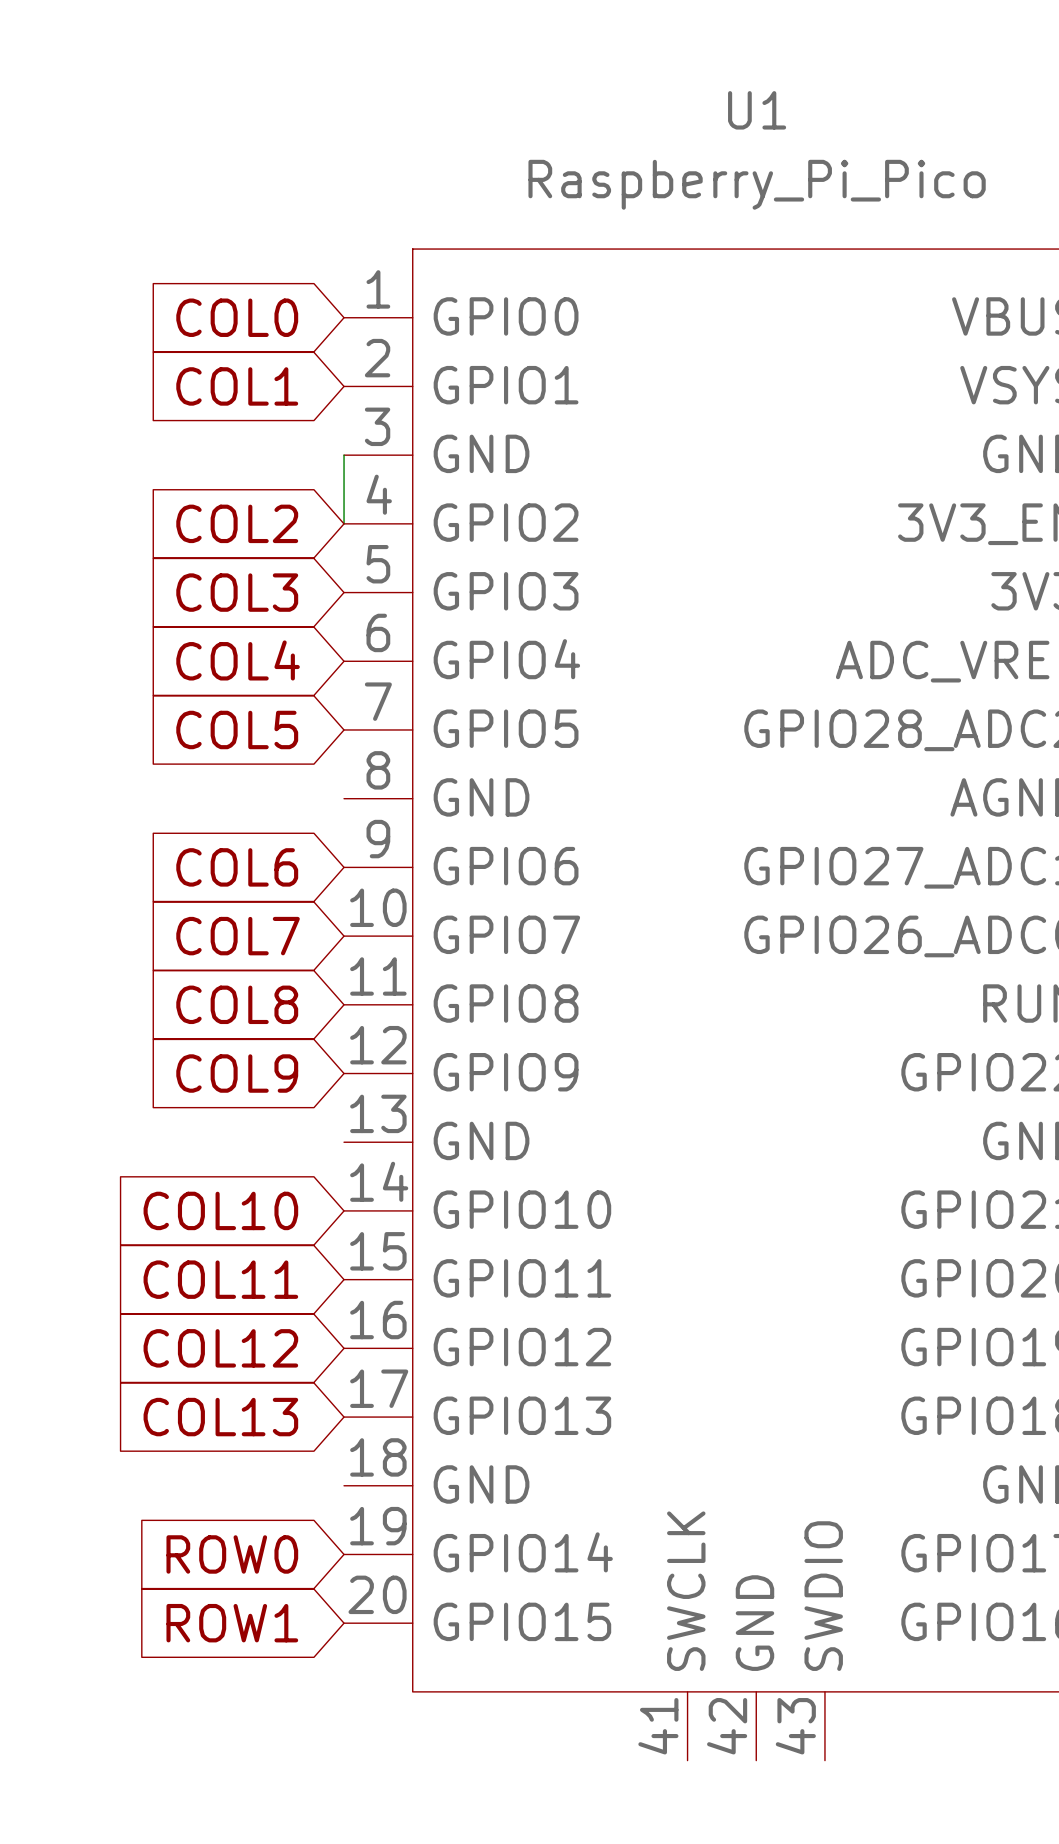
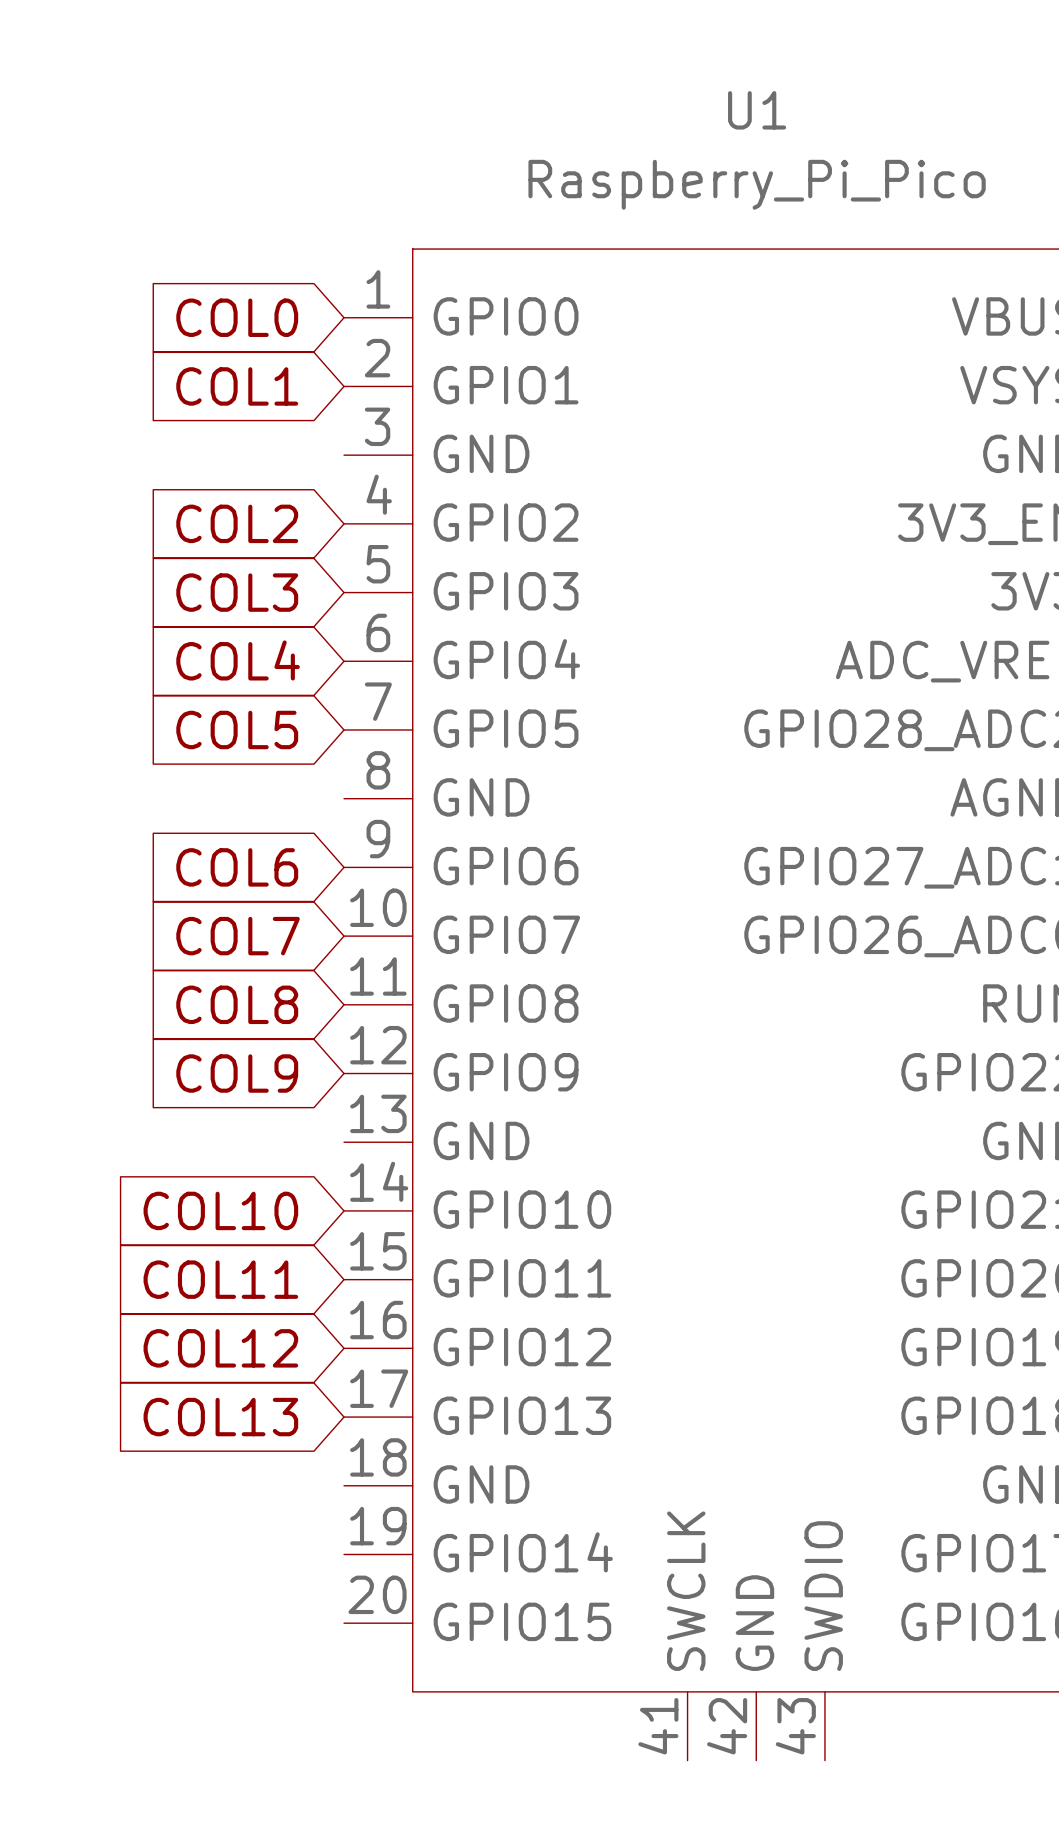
wire: (344, 455) (344, 523) -> none
global label: ROW0 (232, 1554) -> none
global label: ROW1 (232, 1623) -> none

